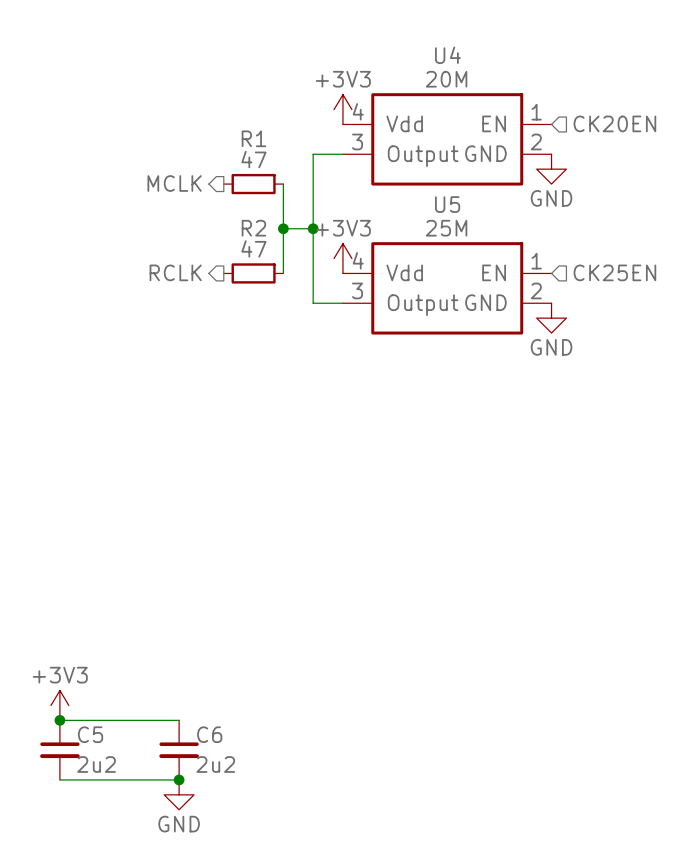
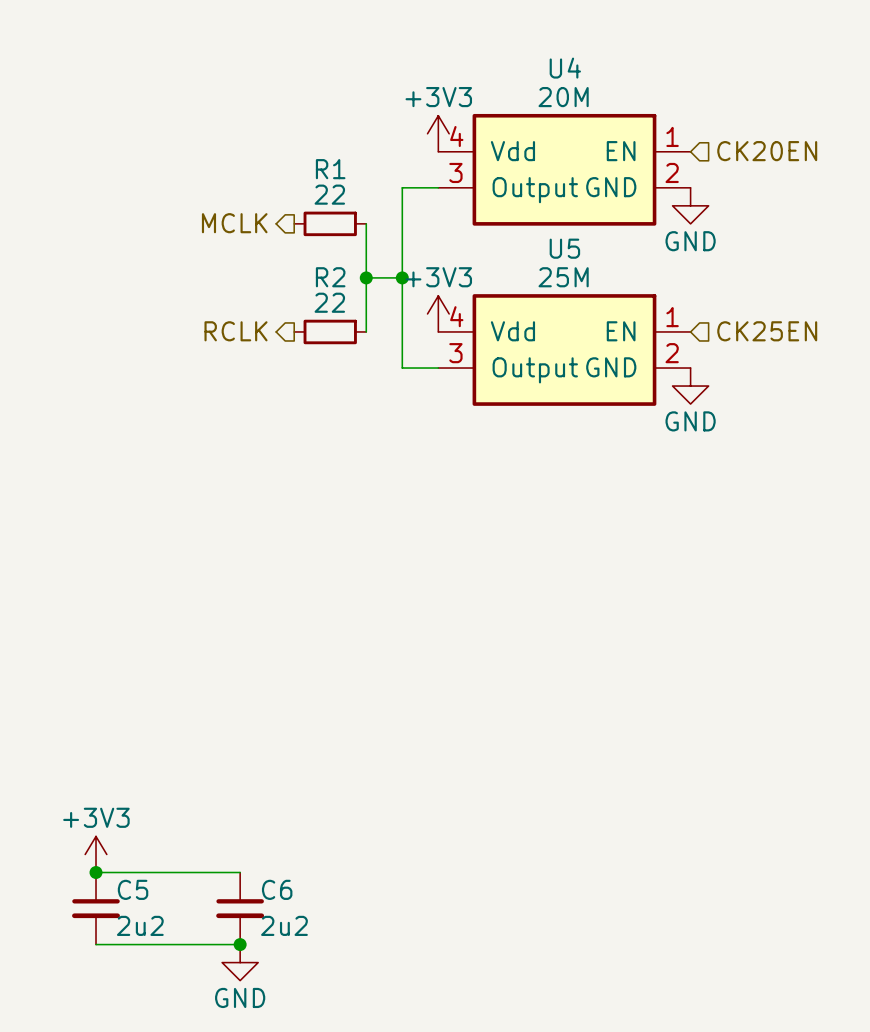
R1 value: 47 (253, 159) -> 22 (329, 194)
R2 value: 47 (253, 248) -> 22 (329, 302)

